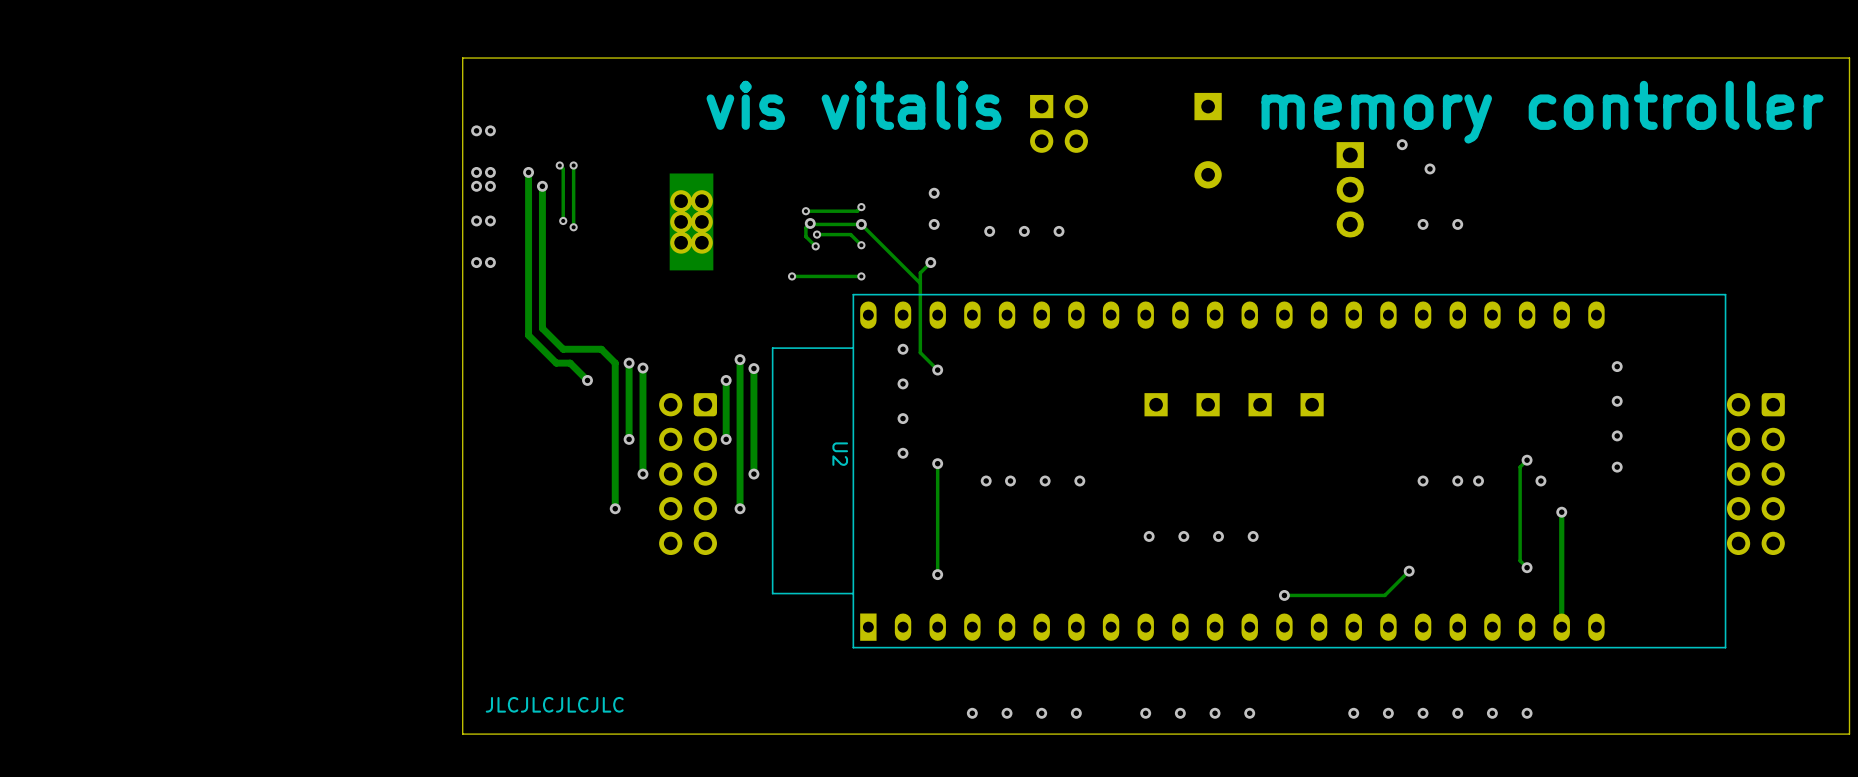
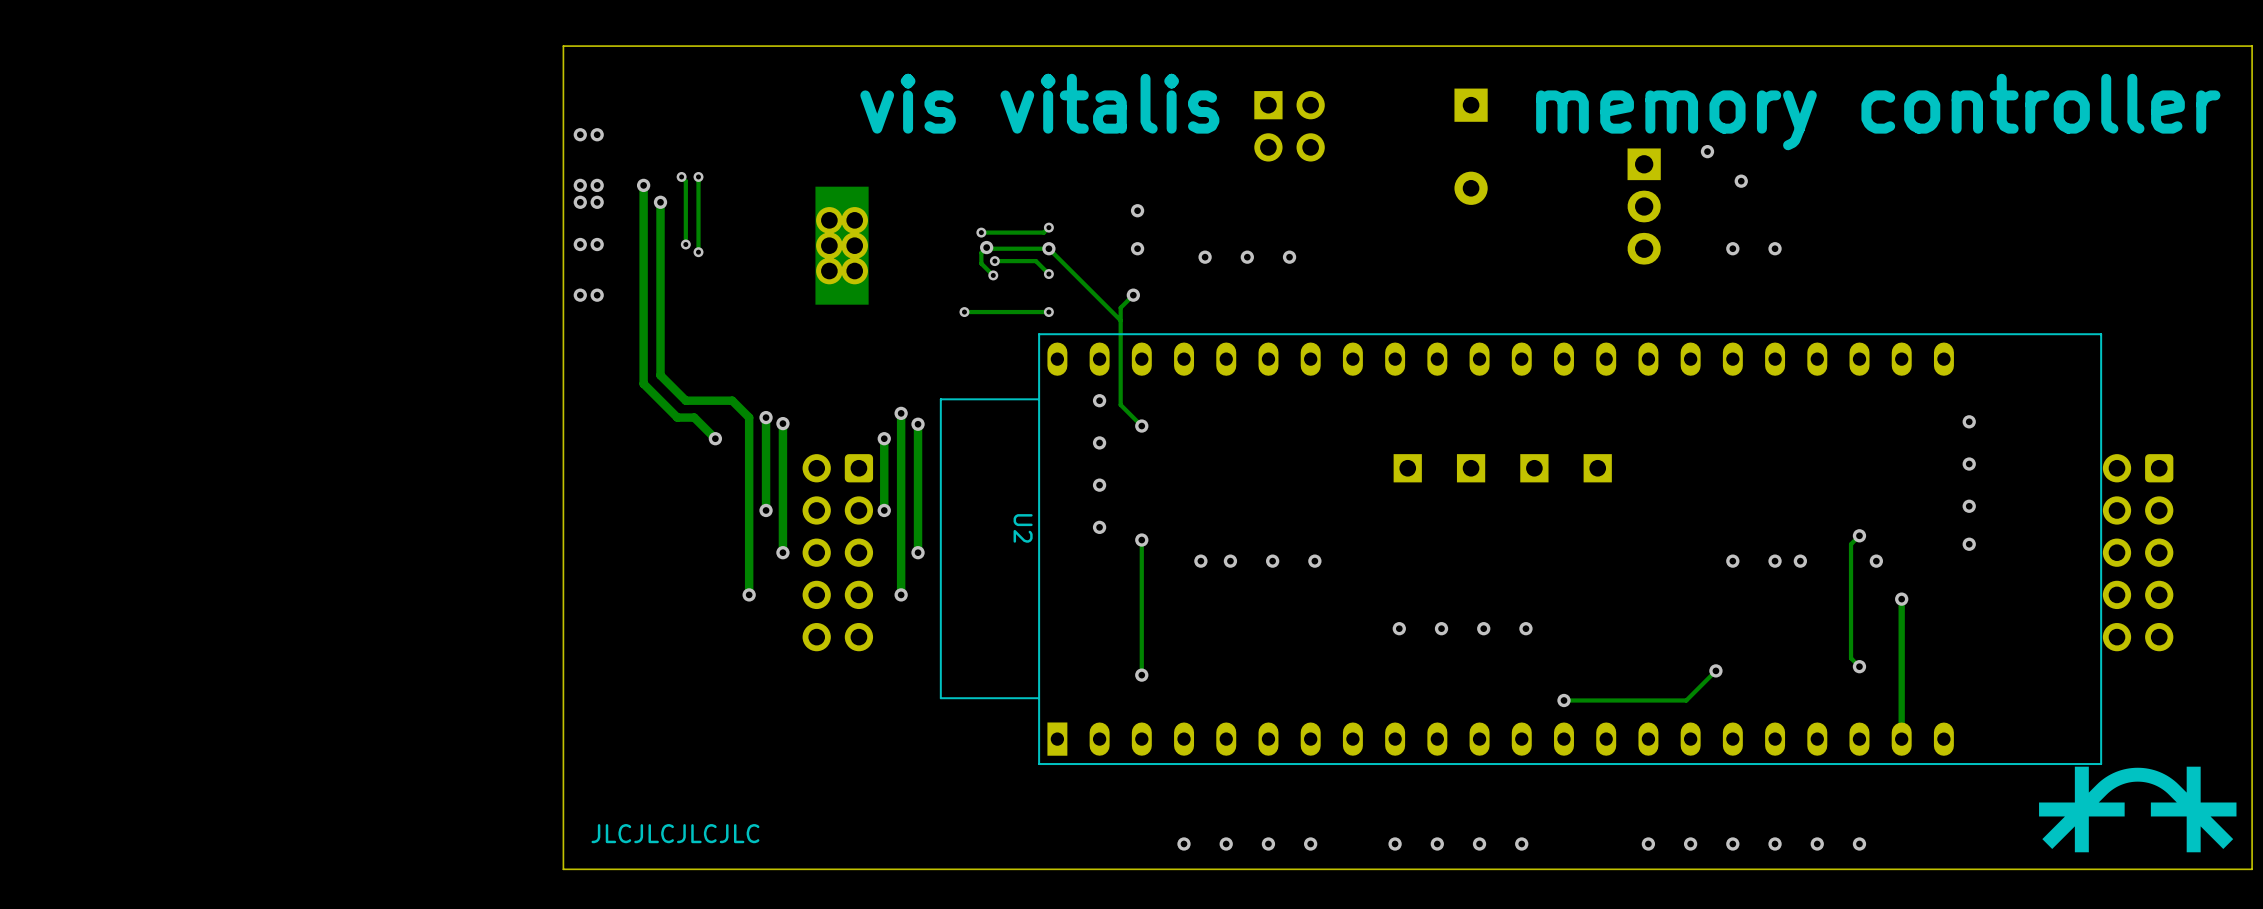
drawing: none -> [2039, 766, 2237, 853]

